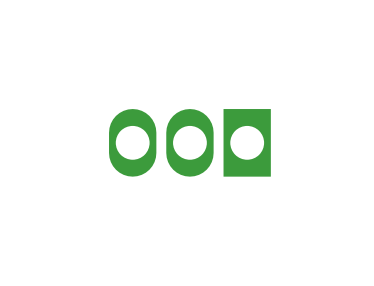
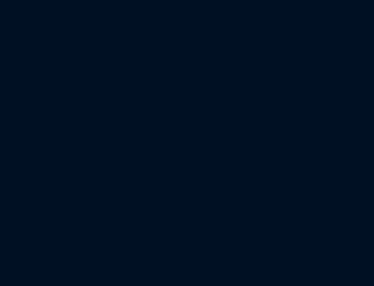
part: (189, 142) -> none

